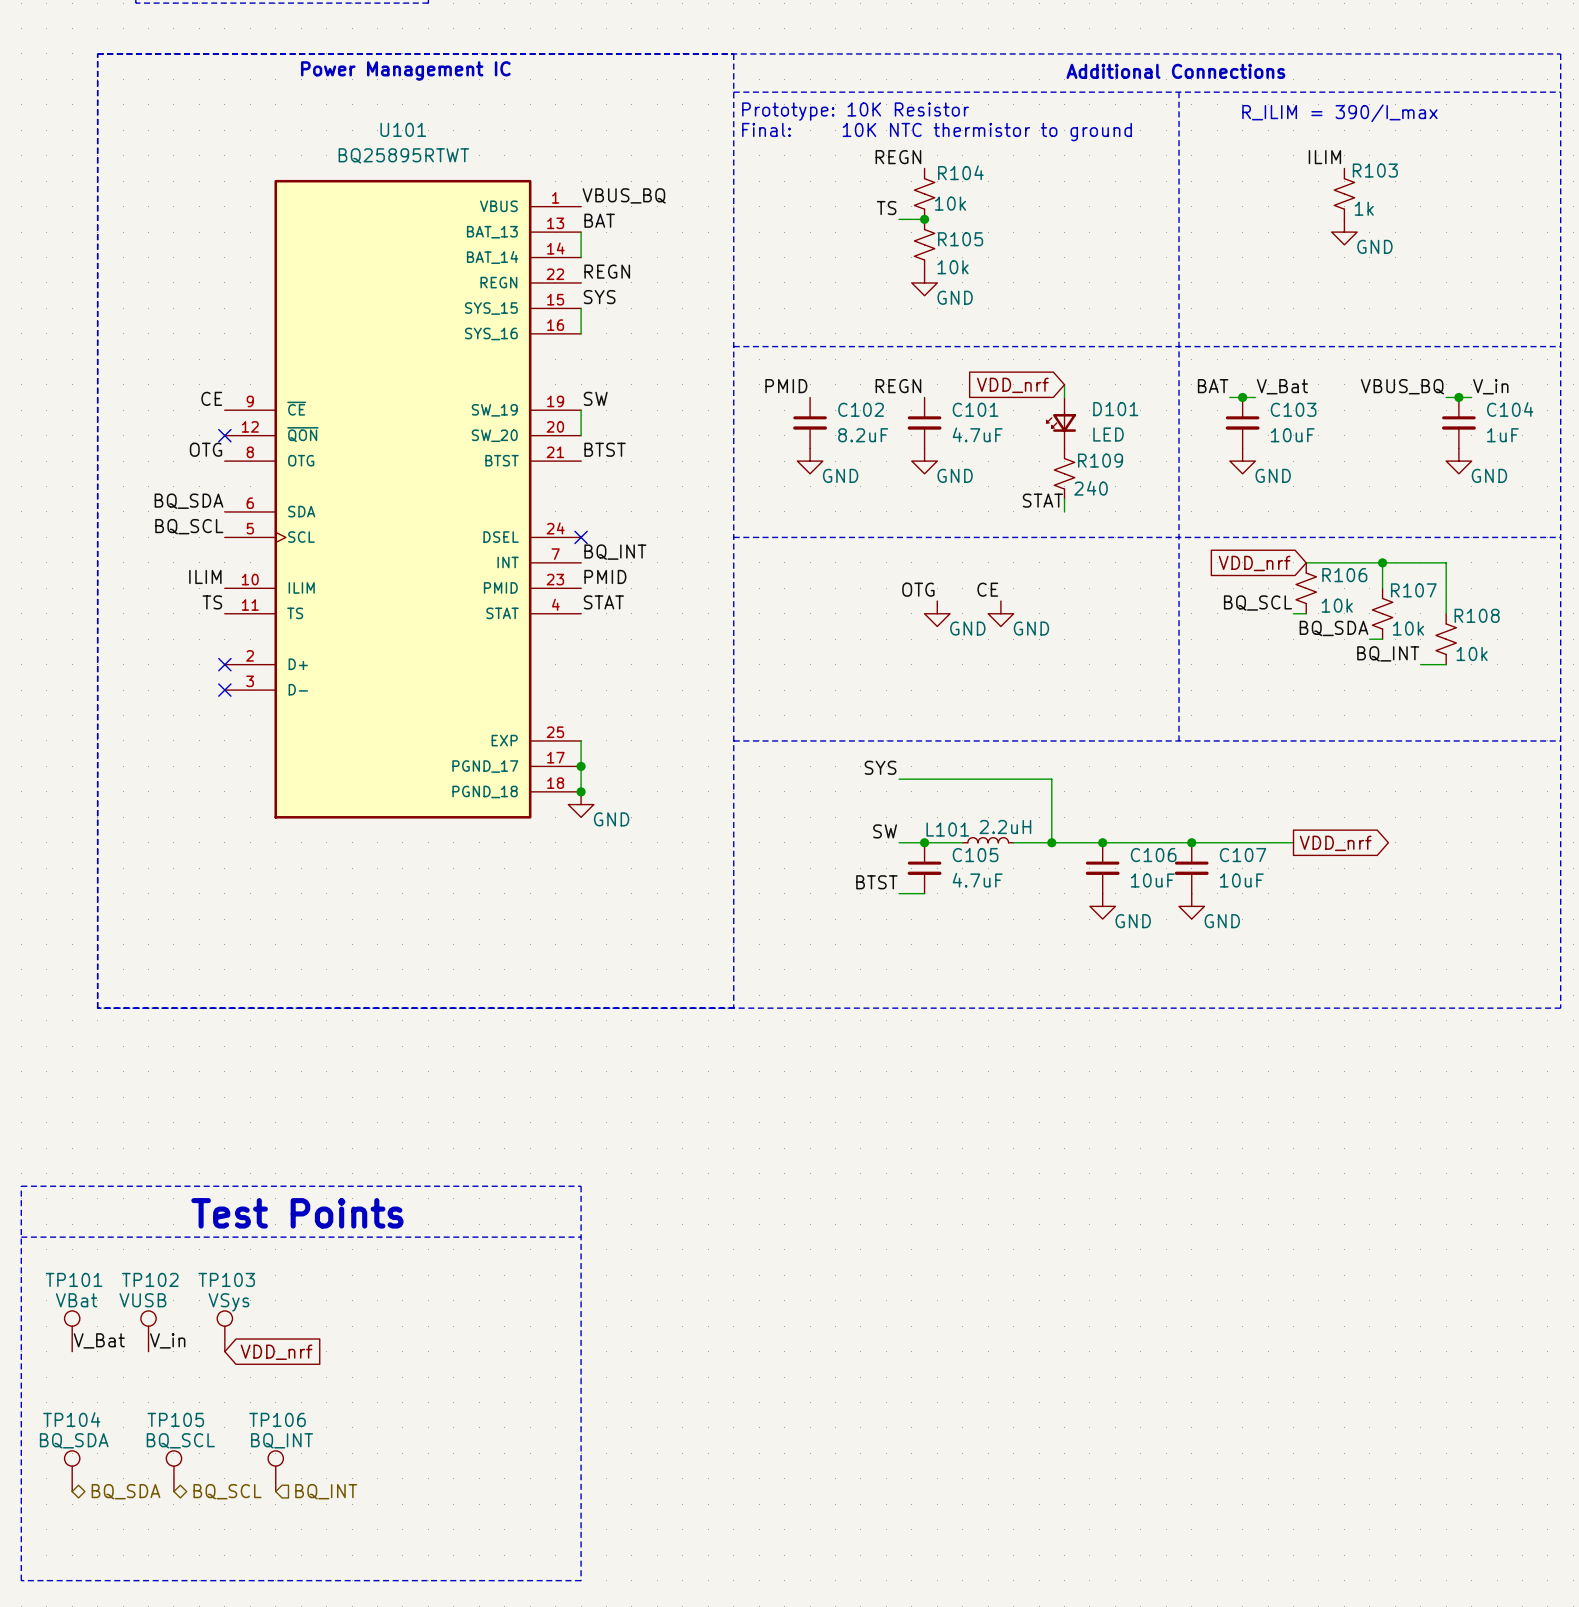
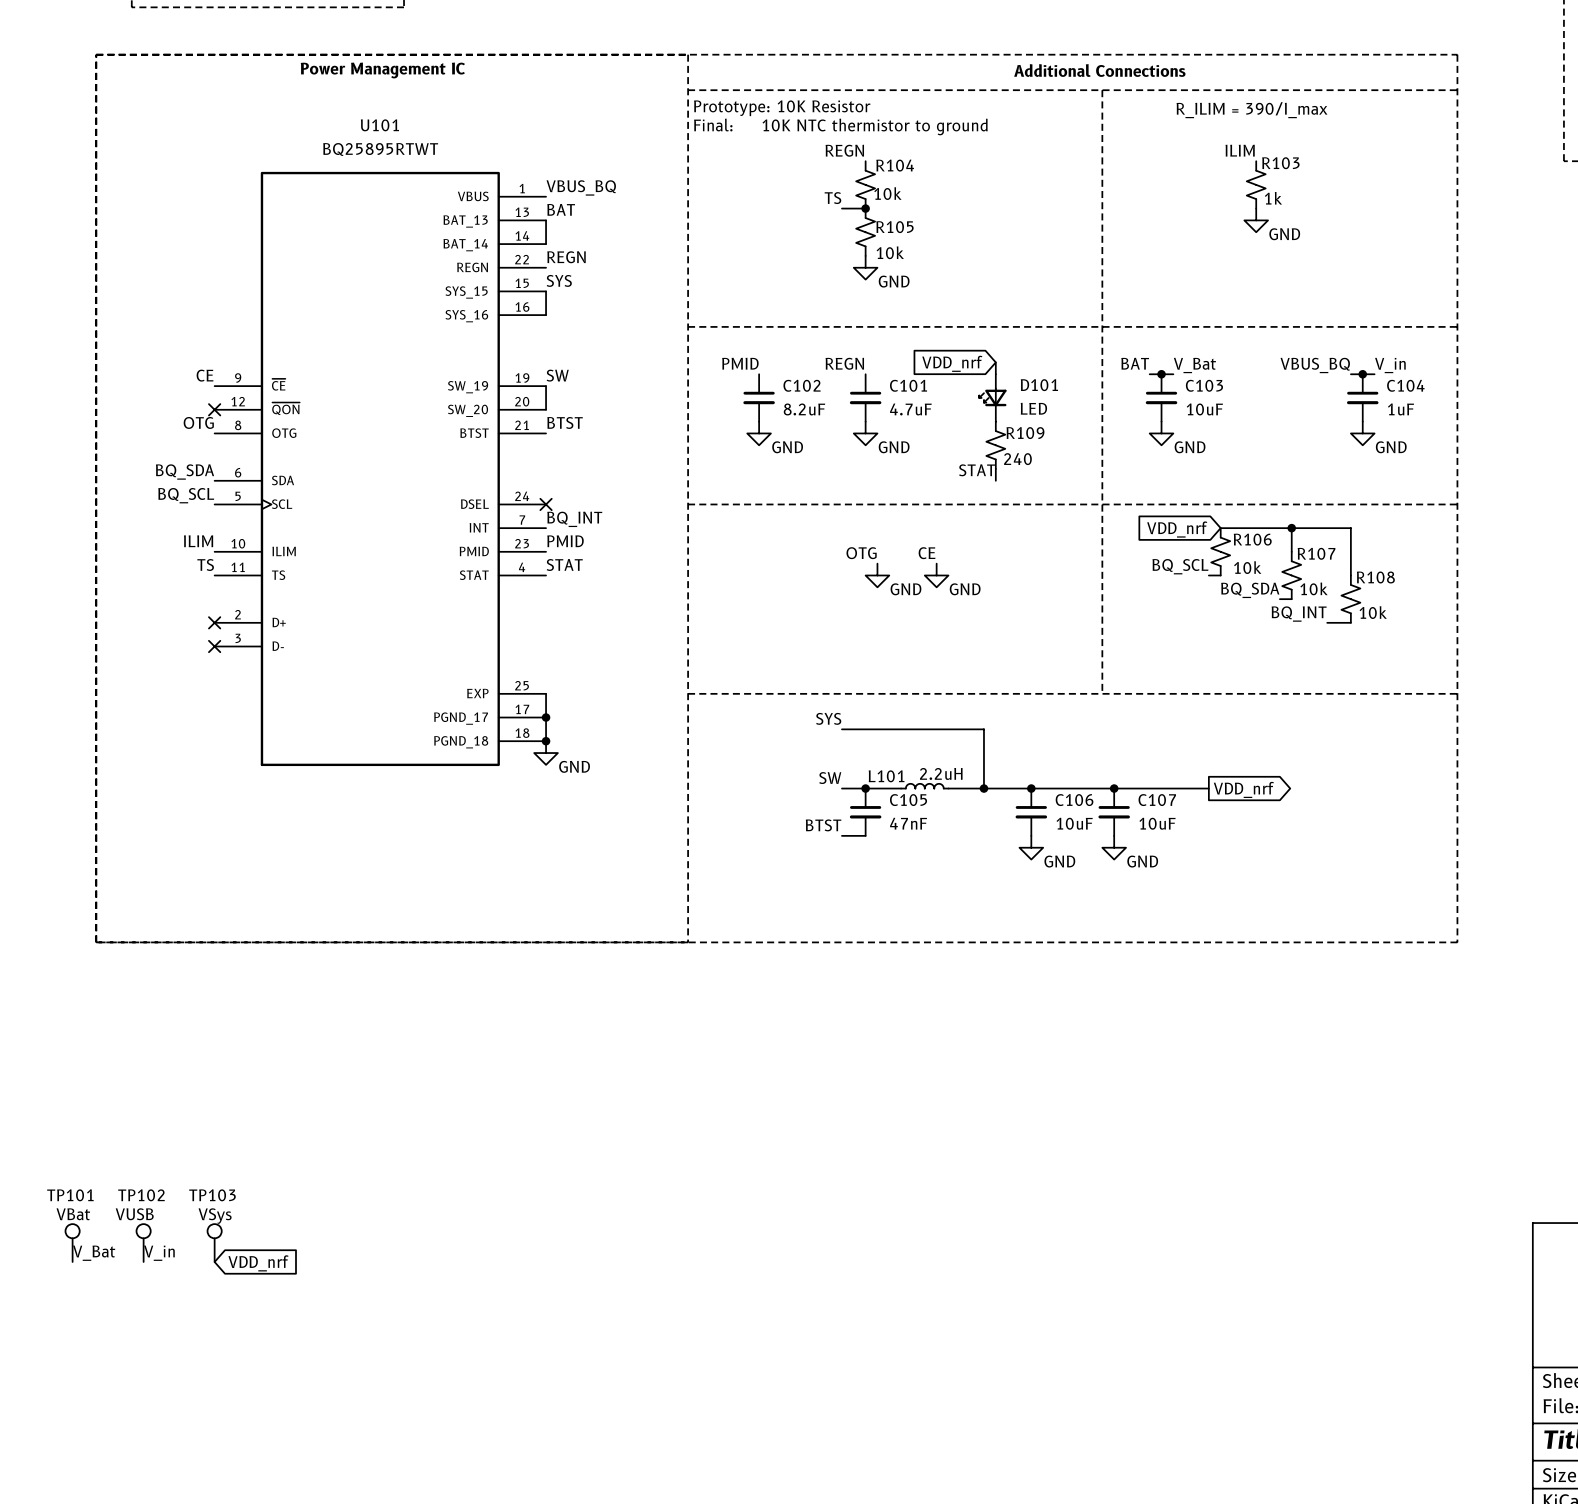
C105 value: 4.7uF (977, 880) -> 47nF (908, 823)
line: (21, 1186) (581, 1186) (581, 1580) (21, 1580) (21, 1186) -> none
text: Test Points (297, 1213) -> none
line: (21, 1237) (581, 1237) -> none
TP104: BQ_SDA (72, 1471) -> none
TP105: BQ_SCL (173, 1471) -> none
TP106: BQ_INT (275, 1471) -> none
hierarchical label: BQ_SDA (126, 1491) -> none
hierarchical label: BQ_SCL (227, 1491) -> none
hierarchical label: BQ_INT (326, 1491) -> none

